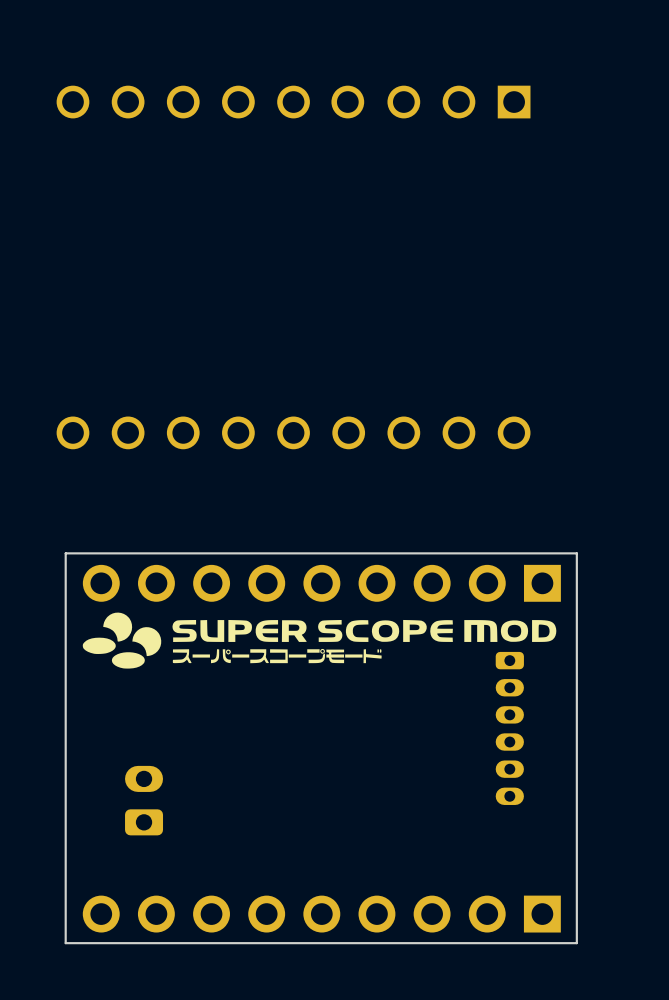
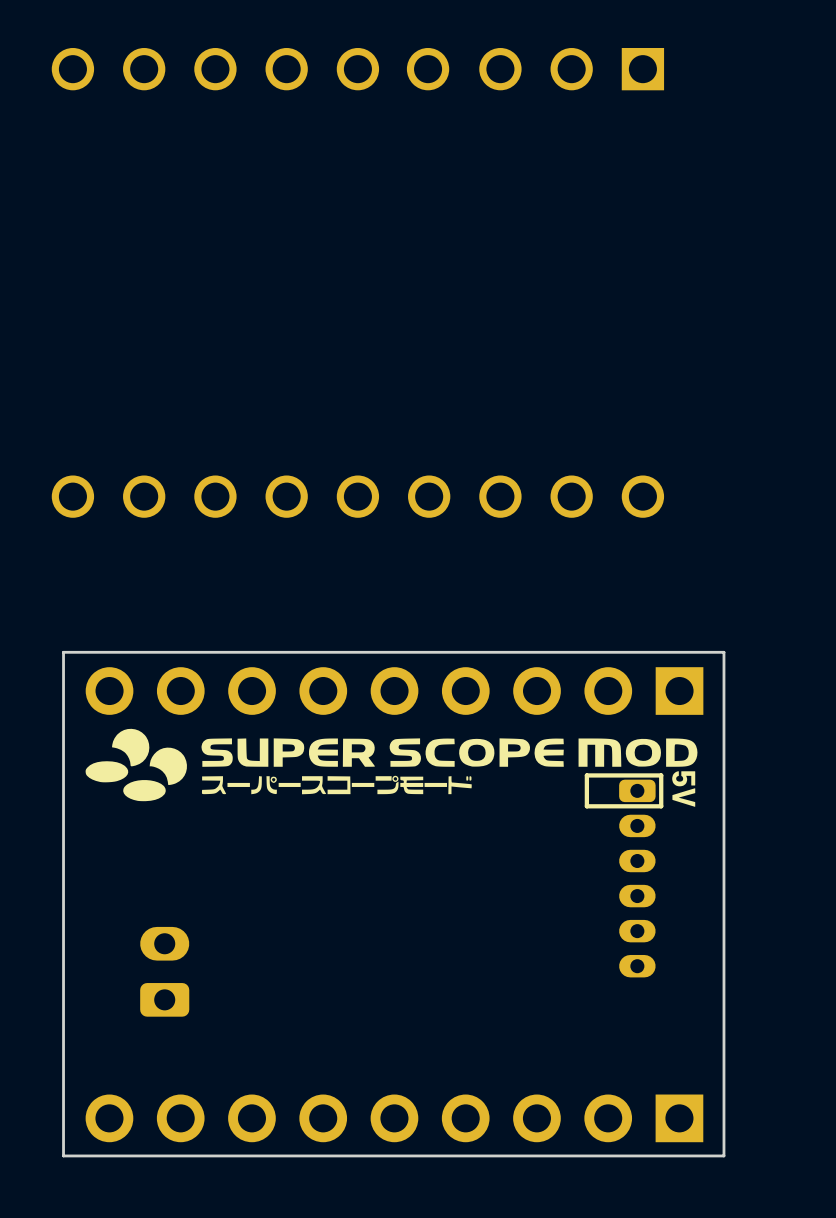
line: none -> (661, 775) (586, 775) (586, 806) (661, 806) (661, 775)
text: none -> 5V (683, 789)

